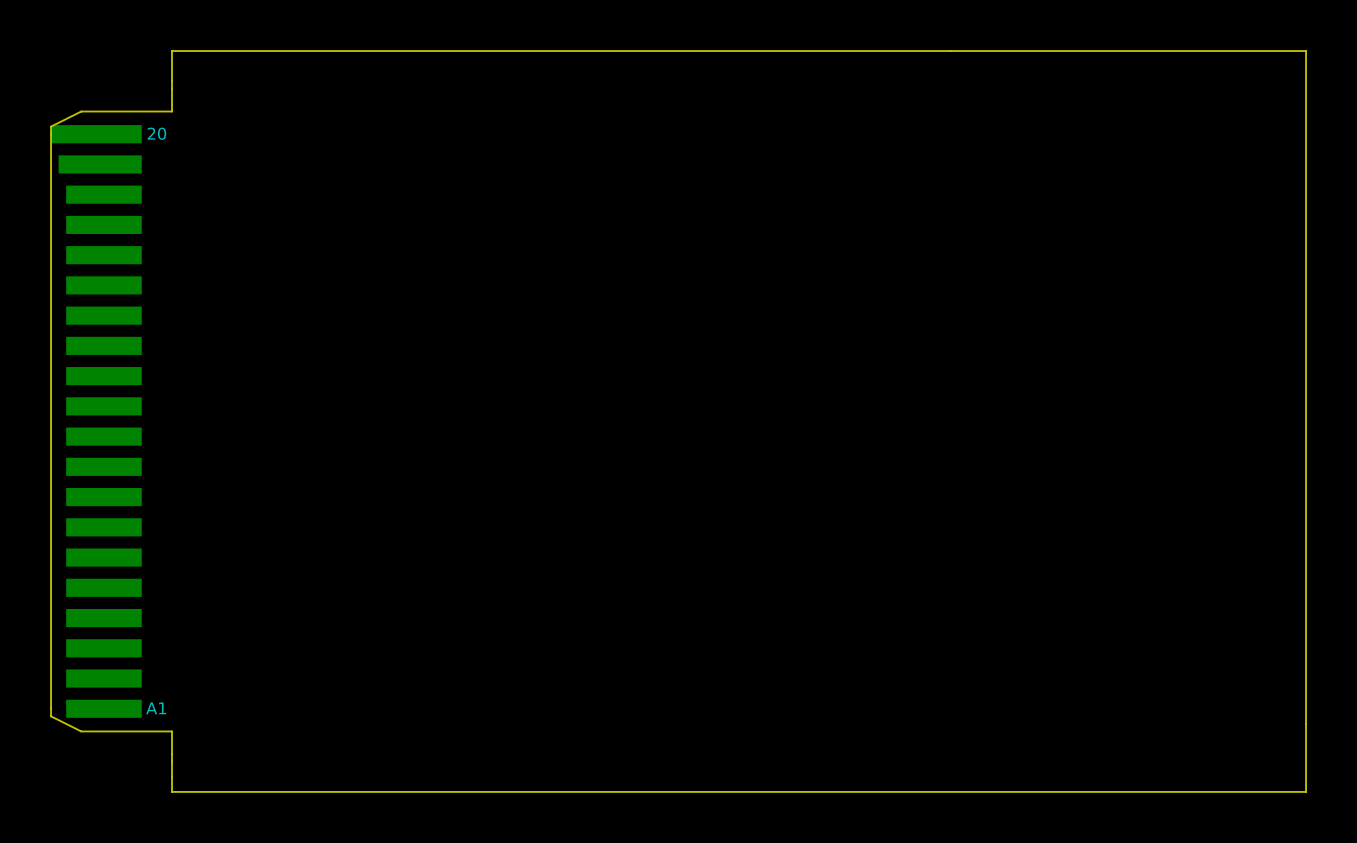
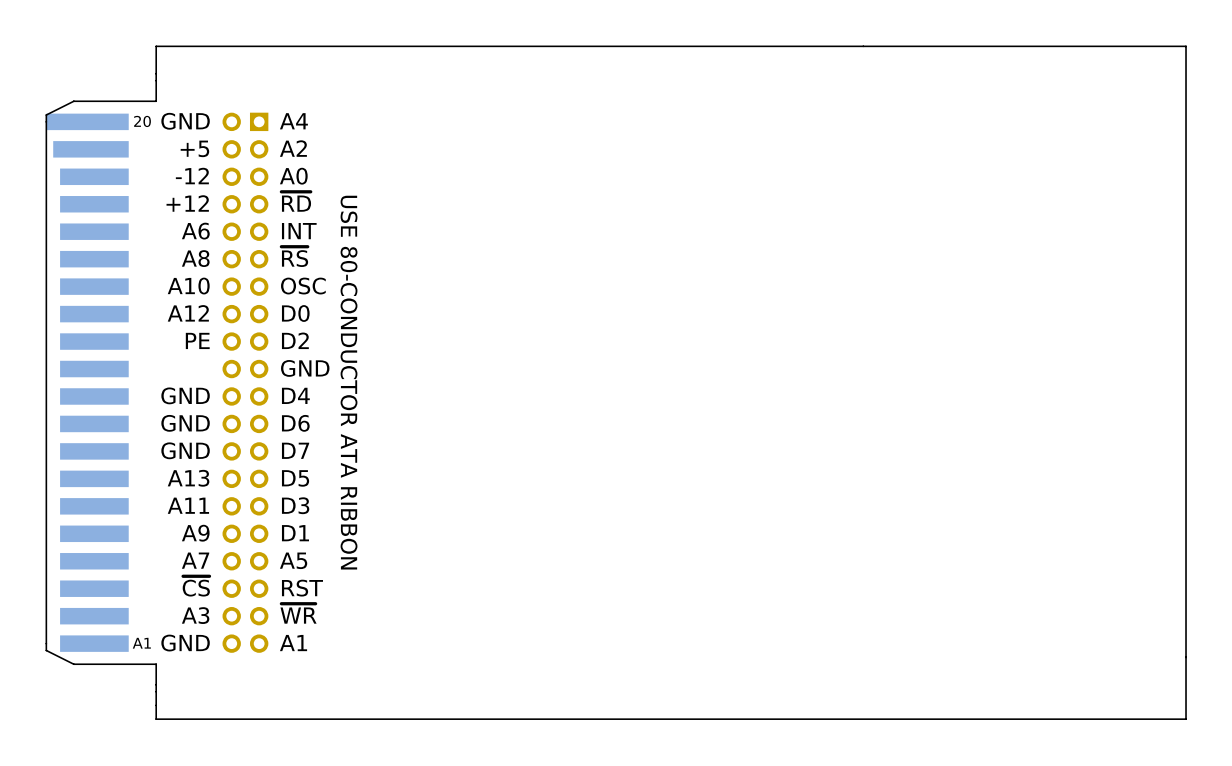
text: none -> GND (185, 121)
text: none -> A4 (293, 121)
text: none -> +5 (194, 148)
text: none -> A2 (293, 148)
text: none -> -12 (192, 176)
text: none -> A0 (293, 176)
text: none -> ~{RD} (296, 201)
text: none -> +12 (187, 203)
text: none -> A6 (195, 231)
text: none -> INT (299, 231)
text: none -> ~{RS} (294, 256)
text: none -> A8 (195, 258)
text: none -> A10 (188, 286)
text: none -> OSC (303, 286)
text: none -> A12 (188, 313)
text: none -> D0 (295, 313)
text: none -> PE (197, 340)
text: none -> D2 (295, 340)
text: none -> GND (305, 368)
part: none -> (245, 382)
text: none -> USE 80-CONDUCTOR ATA RIBBON (349, 382)
text: none -> GND (185, 395)
text: none -> D4 (295, 395)
text: none -> GND (185, 423)
text: none -> D6 (295, 423)
text: none -> GND (185, 450)
text: none -> D7 (295, 450)
text: none -> A13 (188, 478)
text: none -> D5 (295, 478)
text: none -> A11 (188, 505)
text: none -> D3 (295, 505)
text: none -> A9 (195, 533)
text: none -> D1 (295, 533)
text: none -> A7 (195, 560)
text: none -> A5 (293, 560)
text: none -> ~{CS} (196, 586)
text: none -> RST (302, 588)
text: none -> ~{WR} (298, 613)
text: none -> A3 (195, 615)
text: none -> GND (185, 643)
text: none -> A1 (293, 643)

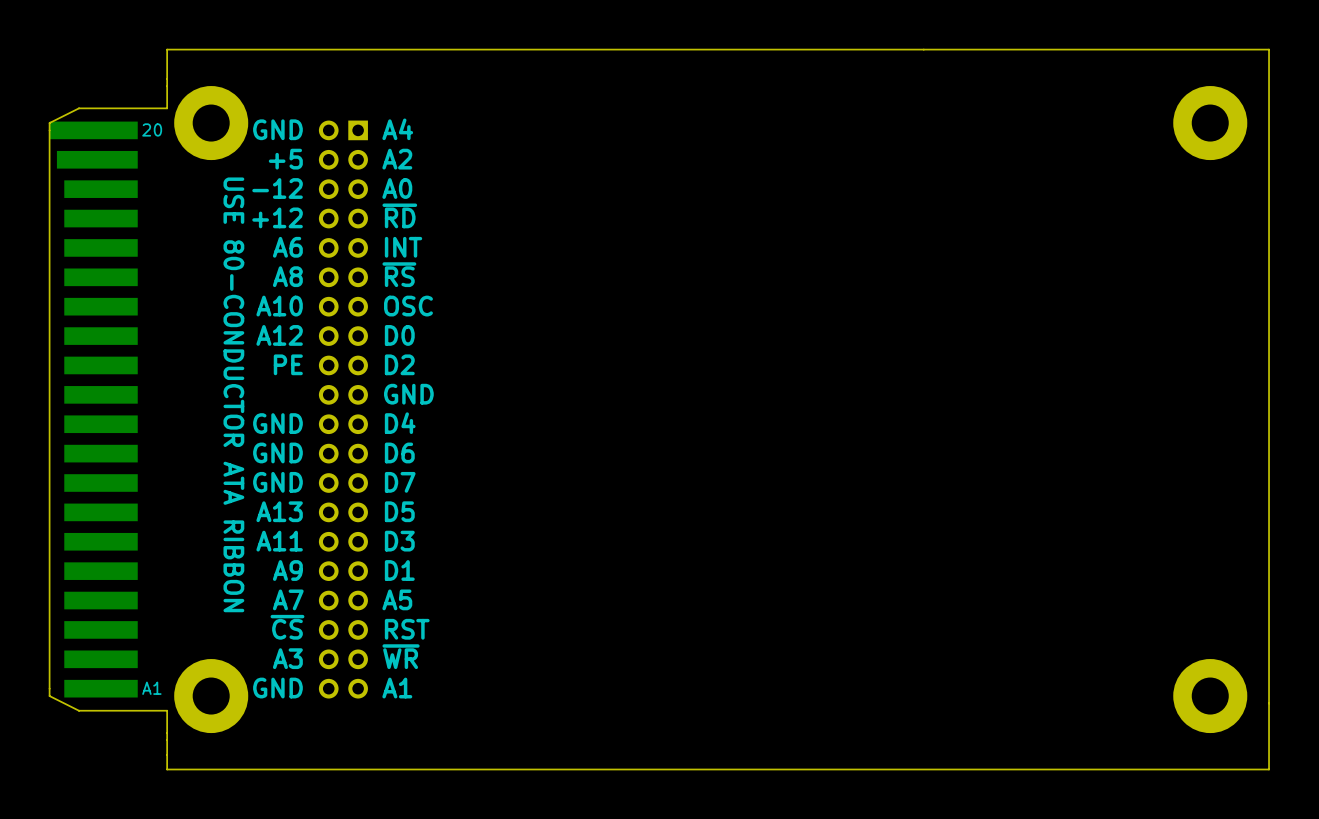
part: none -> (211, 123)
part: none -> (1210, 123)
text position: GND (185, 121) -> GND (277, 129)
text position: A4 (293, 121) -> A4 (397, 129)
text position: +5 (194, 148) -> +5 (285, 159)
text position: A2 (293, 148) -> A2 (397, 159)
text position: -12 (192, 176) -> -12 (277, 188)
text position: A0 (293, 176) -> A0 (397, 188)
text position: ~{RD} (296, 201) -> ~{RD} (399, 215)
text position: +12 (187, 203) -> +12 (277, 217)
text position: A6 (195, 231) -> A6 (287, 247)
text position: INT (299, 231) -> INT (403, 247)
text position: ~{RS} (294, 256) -> ~{RS} (399, 274)
text position: A8 (195, 258) -> A8 (287, 276)
text position: A10 (188, 286) -> A10 (279, 306)
text position: OSC (303, 286) -> OSC (408, 306)
text position: A12 (188, 313) -> A12 (279, 335)
text position: D0 (295, 313) -> D0 (399, 335)
text position: PE (197, 340) -> PE (288, 364)
text position: D2 (295, 340) -> D2 (399, 364)
text position: GND (305, 368) -> GND (277, 423)
text: none -> GND (408, 394)
part position: (245, 382) -> (343, 409)
text position: USE 80-CONDUCTOR ATA RIBBON (349, 382) -> USE 80-CONDUCTOR ATA RIBBON (233, 394)
text: GND (185, 395) -> none
text position: D4 (295, 395) -> D4 (400, 423)
text: GND (185, 423) -> none
text: none -> GND (277, 452)
text position: D6 (295, 423) -> D6 (399, 452)
text: GND (185, 450) -> none
text: none -> GND (277, 482)
text position: D7 (295, 450) -> D7 (400, 482)
text position: A13 (188, 478) -> A13 (279, 511)
text position: D5 (295, 478) -> D5 (399, 511)
text position: A11 (188, 505) -> A11 (279, 541)
text position: D3 (295, 505) -> D3 (399, 541)
text position: A9 (195, 533) -> A9 (287, 570)
text position: D1 (295, 533) -> D1 (399, 570)
text position: A7 (195, 560) -> A7 (288, 599)
text position: A5 (293, 560) -> A5 (397, 599)
text position: ~{CS} (196, 586) -> ~{CS} (287, 627)
text position: RST (302, 588) -> RST (407, 629)
text position: ~{WR} (298, 613) -> ~{WR} (401, 656)
text position: A3 (195, 615) -> A3 (287, 658)
text position: GND (185, 643) -> GND (277, 688)
text position: A1 (293, 643) -> A1 (397, 688)
part: none -> (211, 696)
part: none -> (1210, 696)

